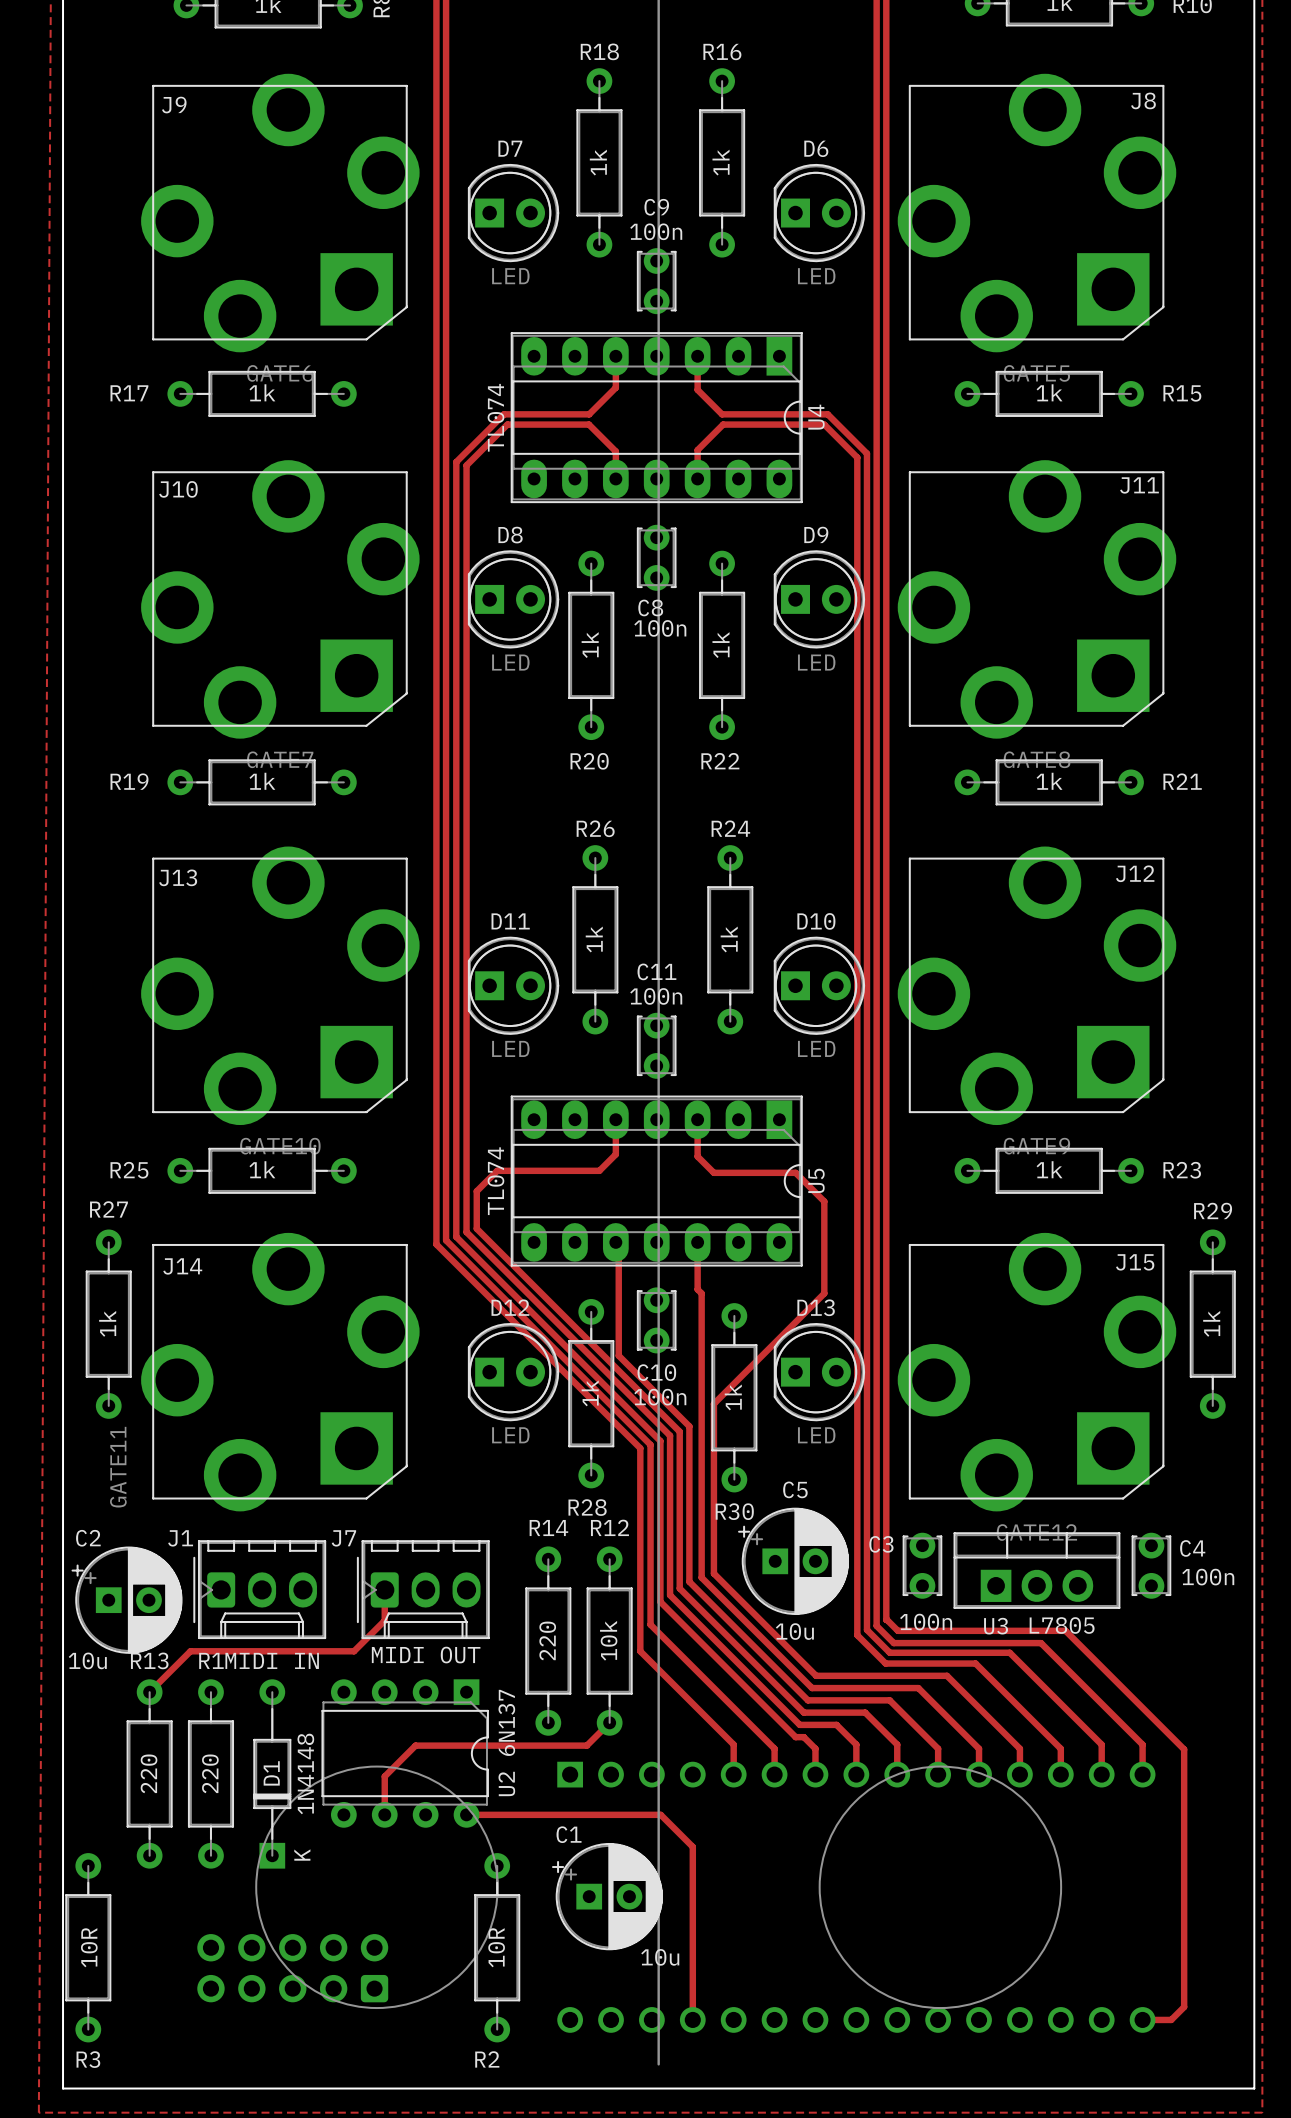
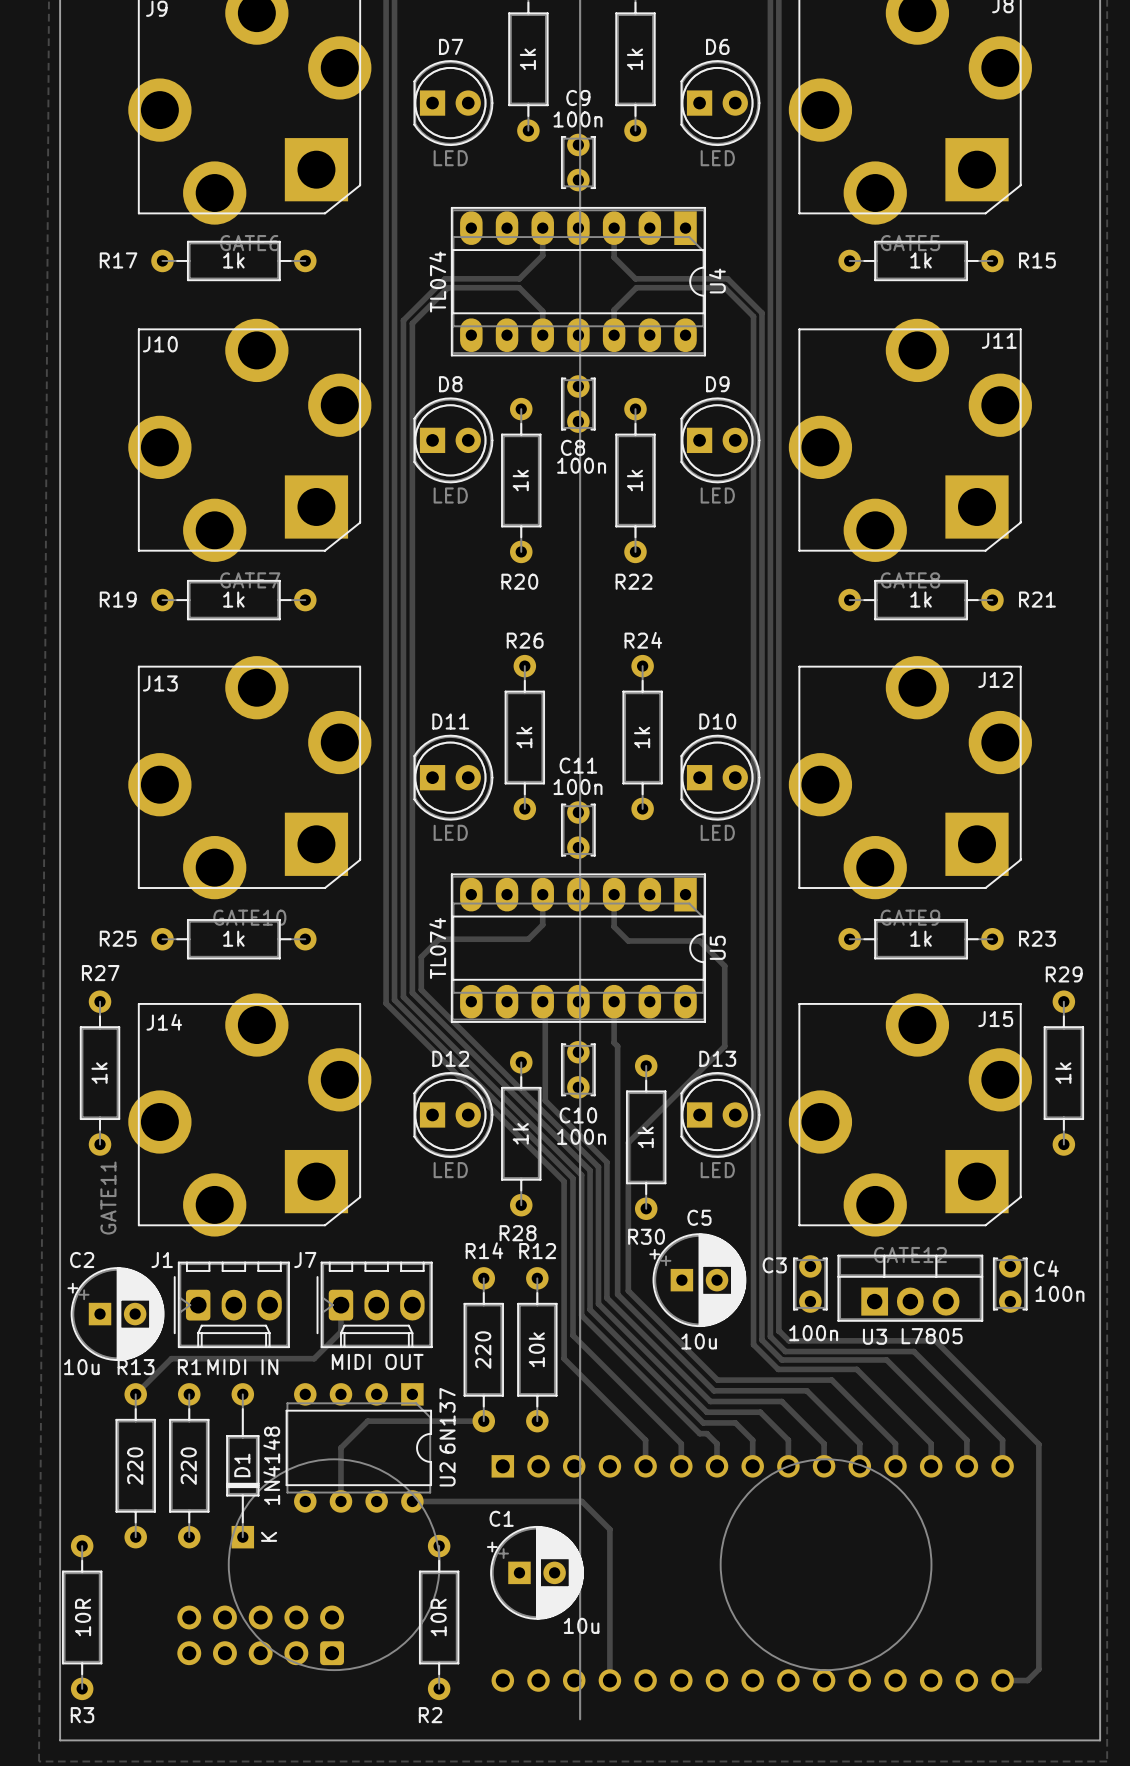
track: (609, 1722) (586, 1745) (415, 1745) (384, 1776) -> (483, 1421) (367, 1421) (340, 1447) (340, 1467)

